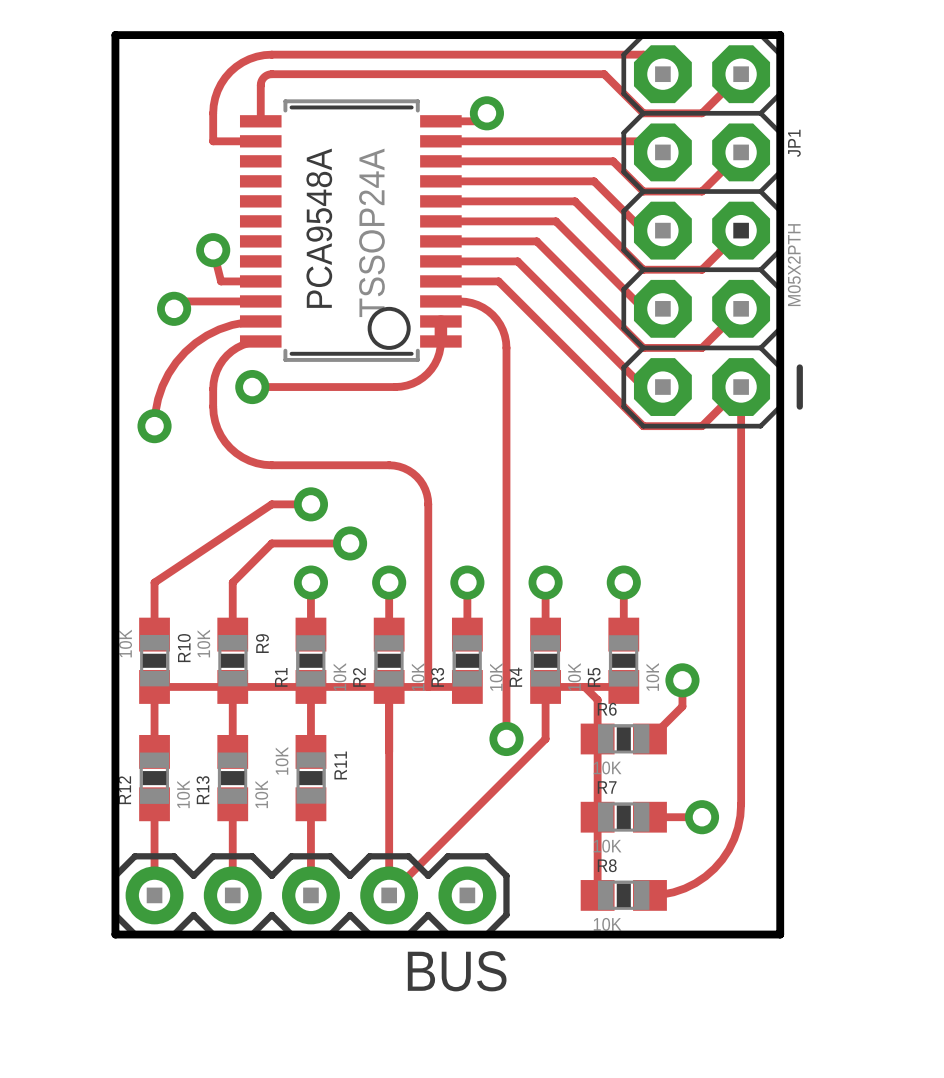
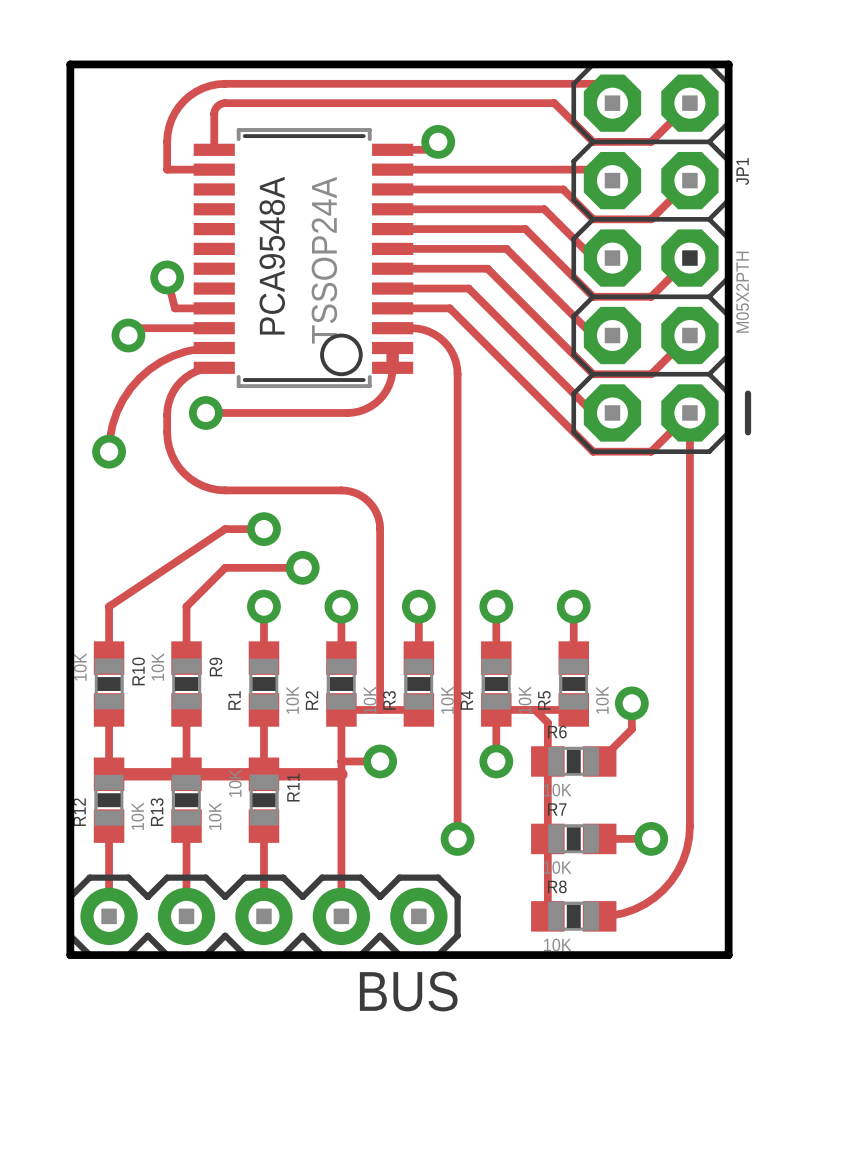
track: (154, 686) (389, 686) -> (109, 774) (341, 774)
track: none -> (341, 761) (380, 761)
via: none -> (380, 761)
track: none -> (457, 761) (457, 838)
via: (506, 738) -> none
track: (545, 738) (389, 895) -> none
via: none -> (496, 761)
via: none -> (457, 838)

